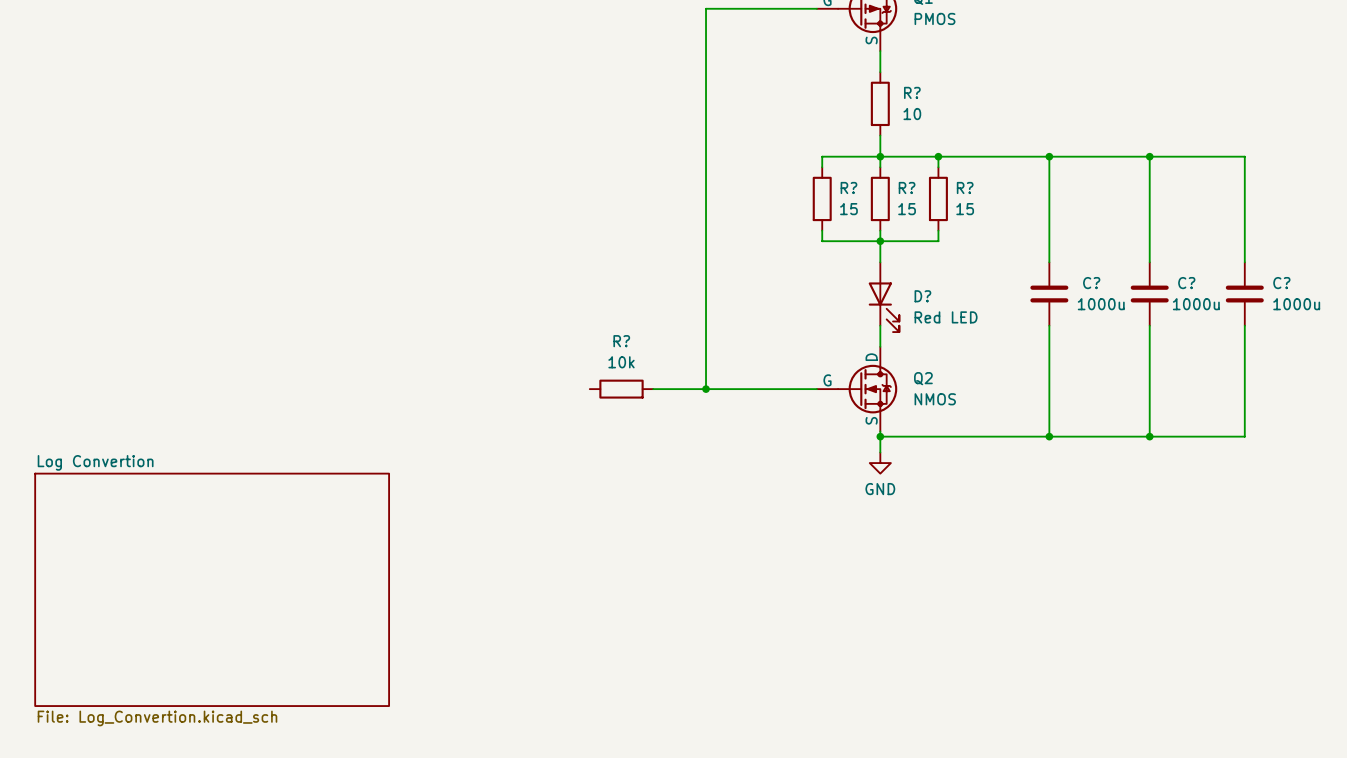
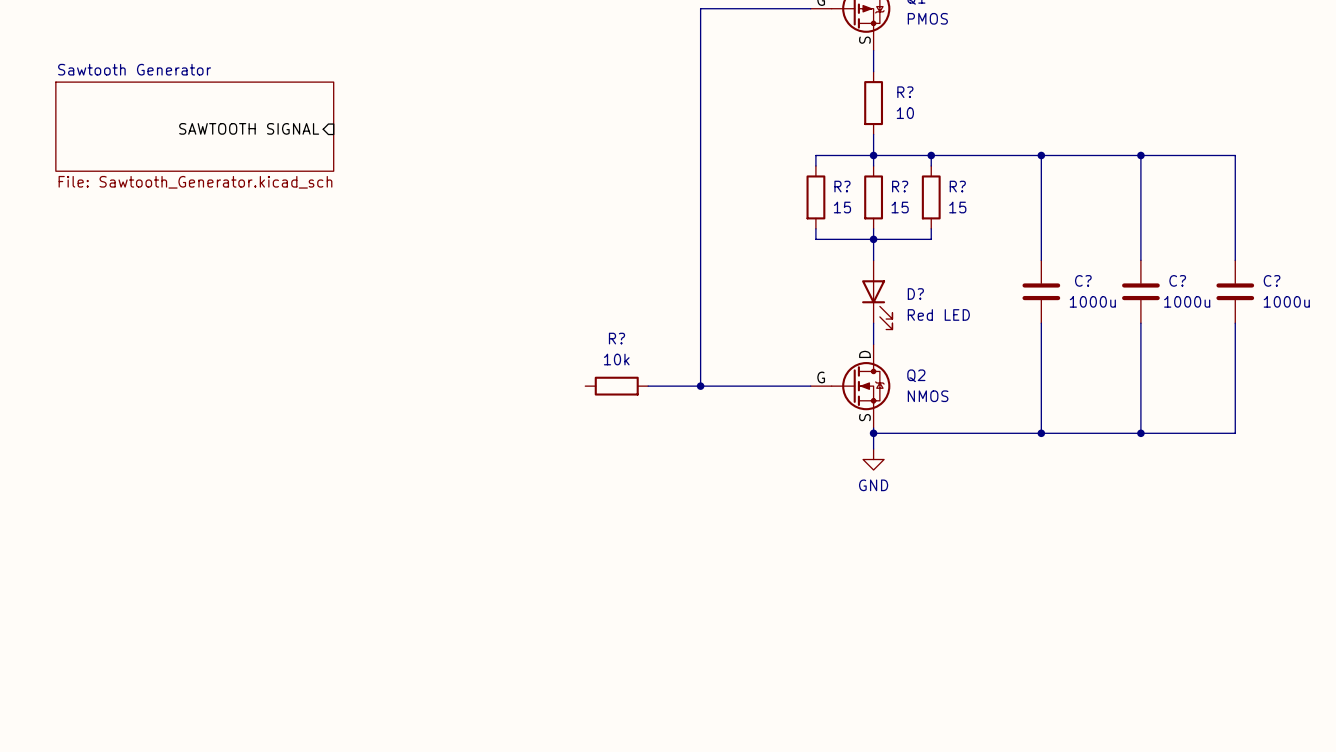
sheet Sawtooth Generator: none -> File: Sawtooth_Generator.kicad_sch (194, 126)
sheet pin: none -> SAWTOOTH SIGNAL (249, 128)
sheet Log Convertion: File: Log_Convertion.kicad_sch (212, 589) -> none

